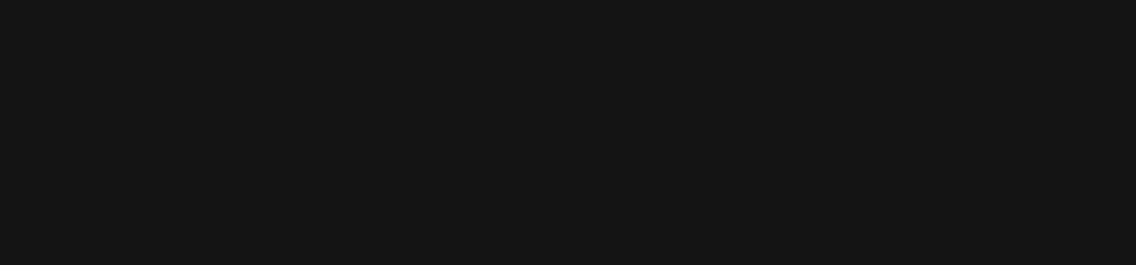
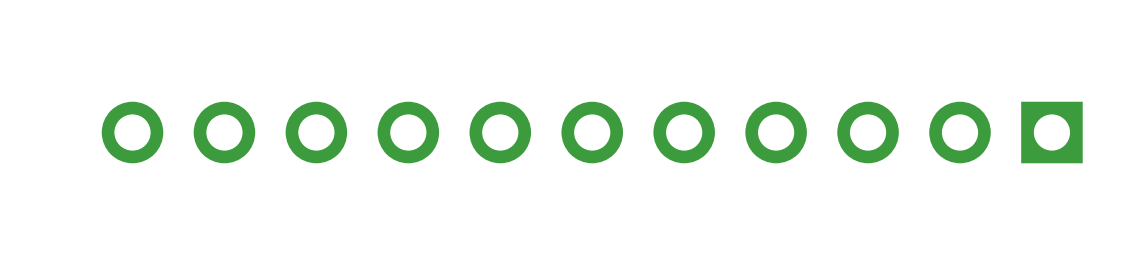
part: none -> (592, 132)

